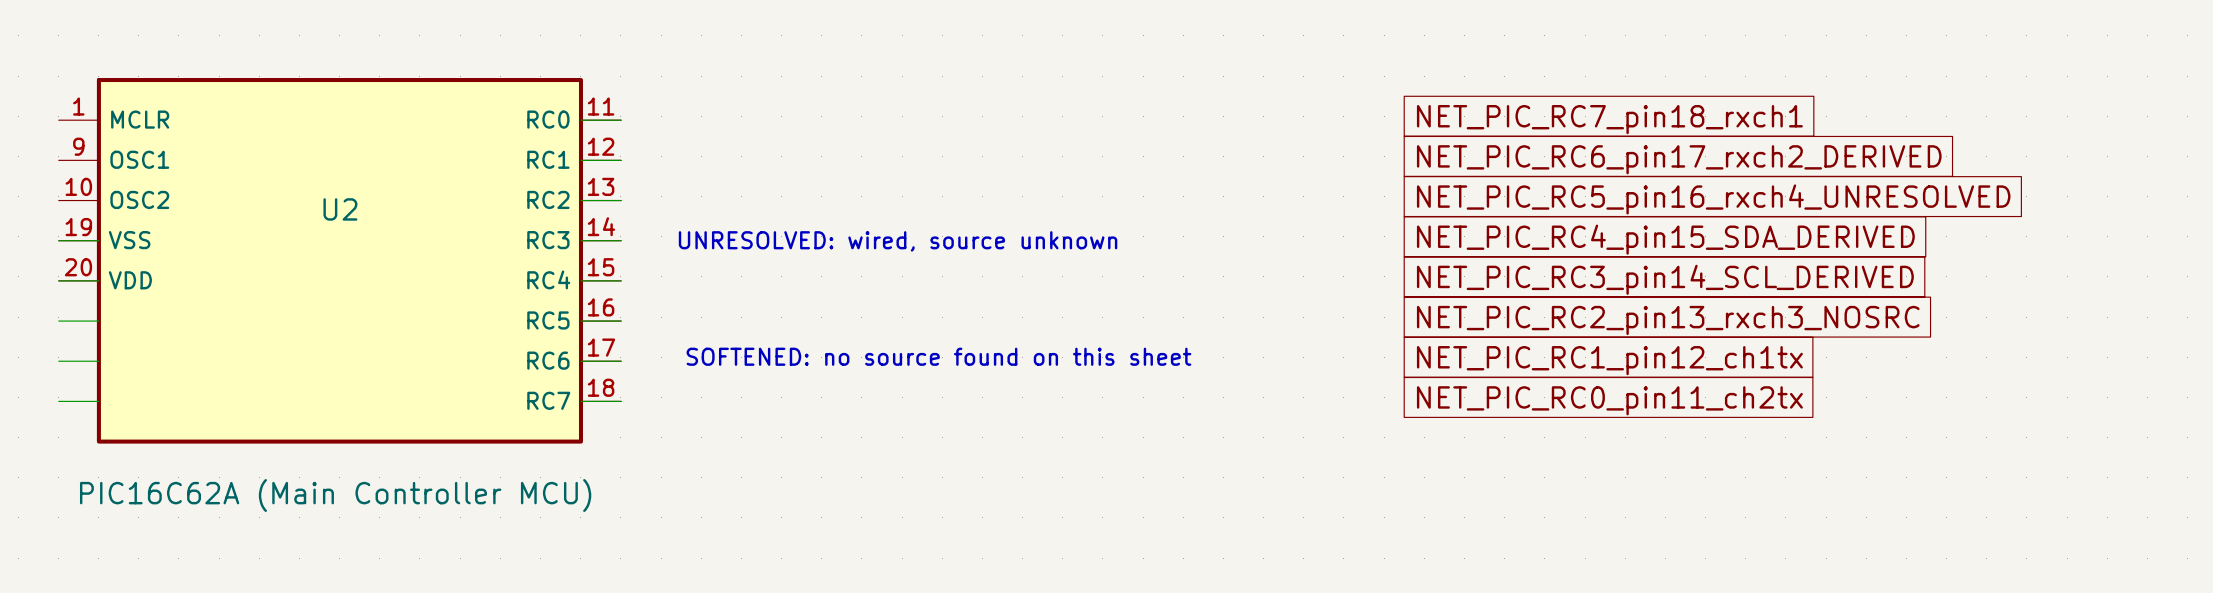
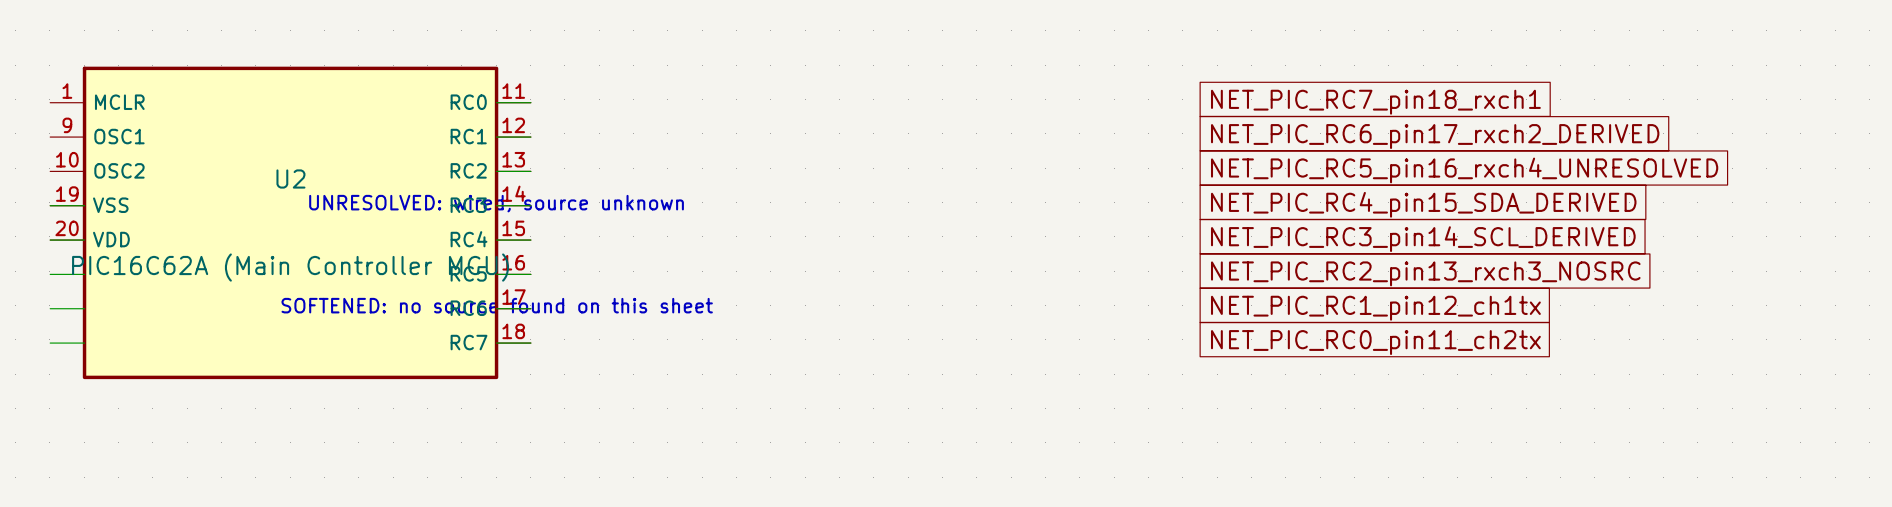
text position: UNRESOLVED: wired, source unknown (898, 241) -> UNRESOLVED: wired, source unknown (496, 203)
text position: SOFTENED: no source found on this sheet (938, 356) -> SOFTENED: no source found on this sheet (497, 305)
U2 value position: PIC16C62A (Main Controller MCU) (335, 495) -> PIC16C62A (Main Controller MCU) (290, 267)

